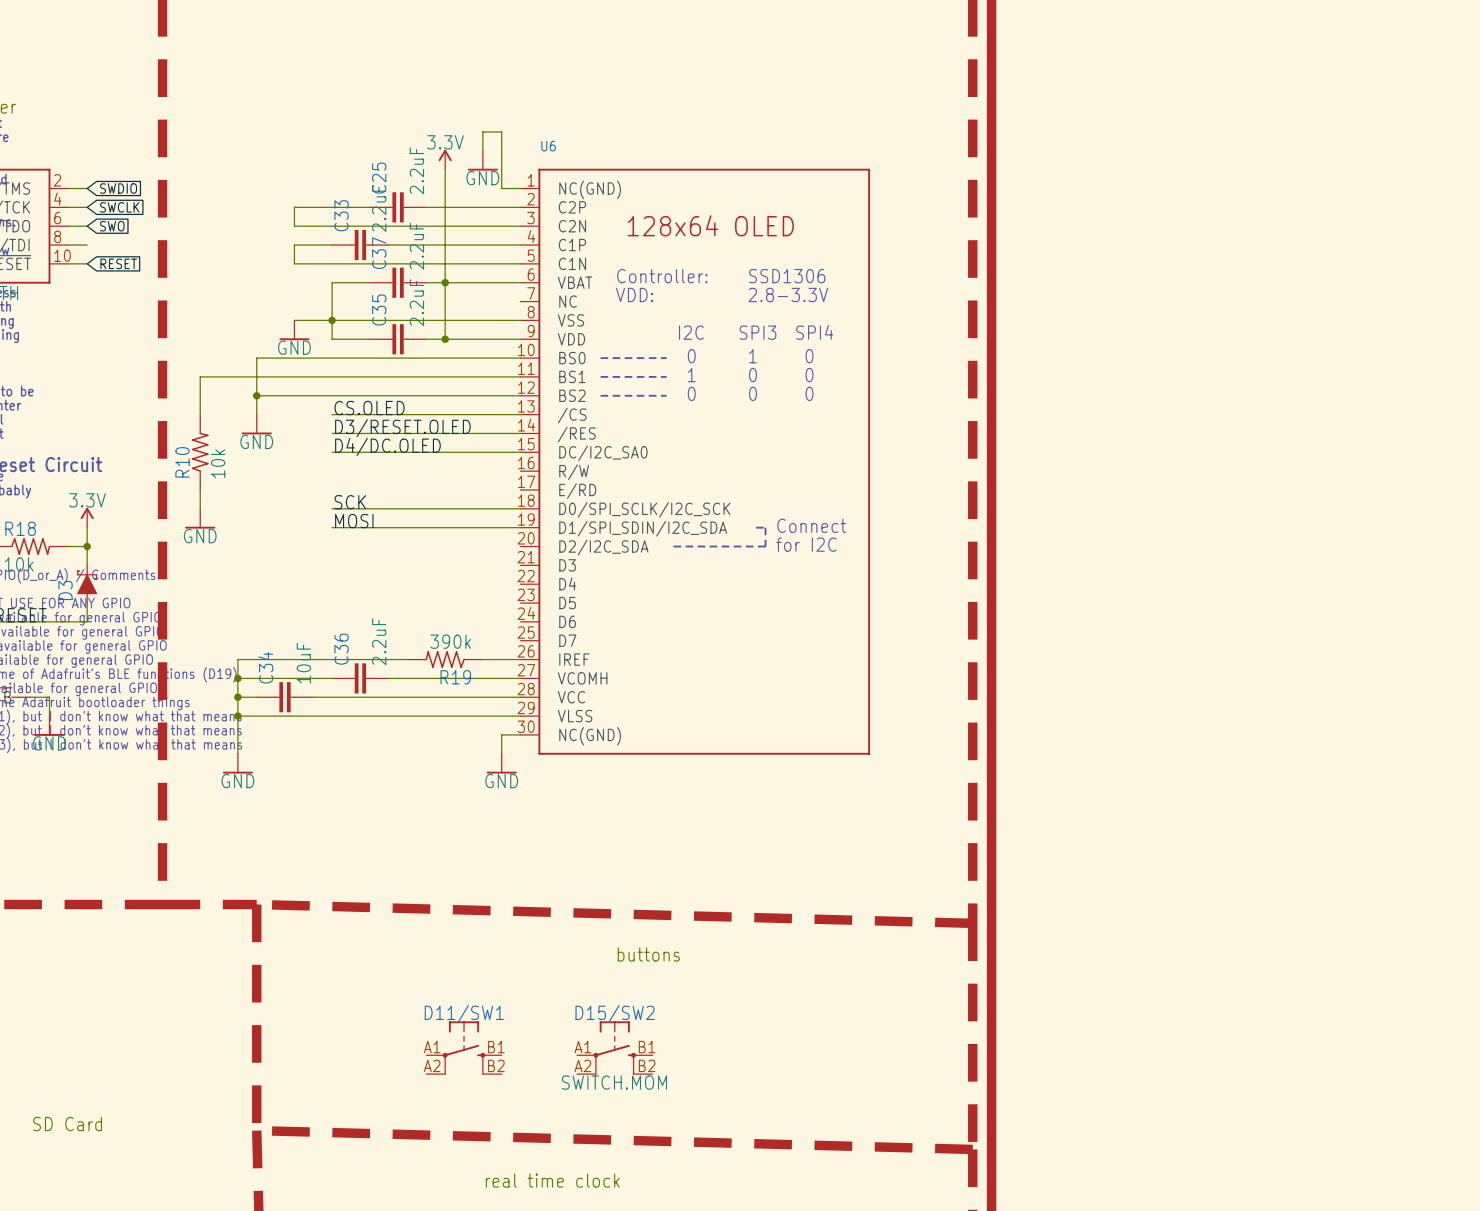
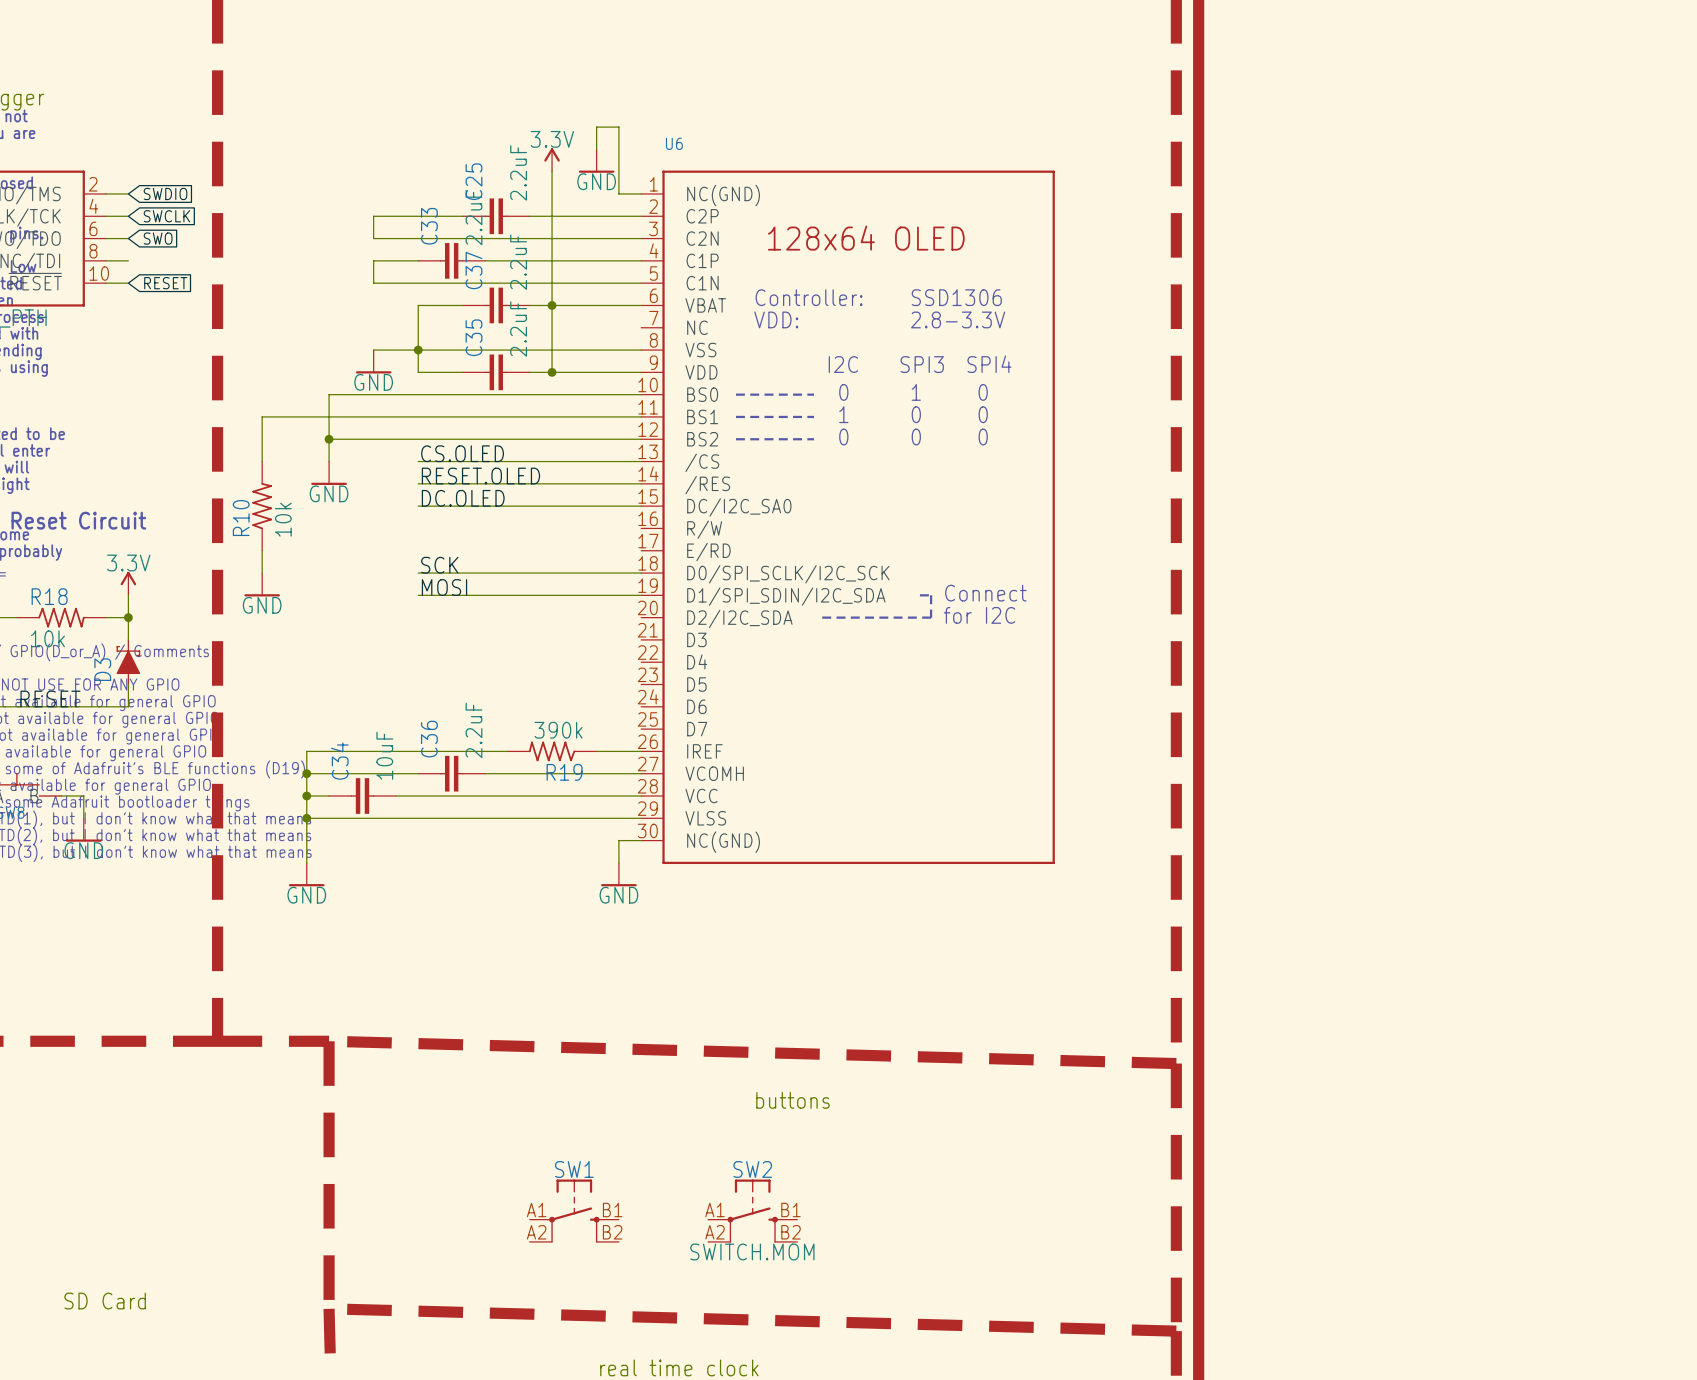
label: D3/RESET.OLED (402, 428) -> RESET.OLED (480, 476)
label: D4/DC.OLED (387, 446) -> DC.OLED (463, 498)
D11/SW1 name: D11/SW1 (464, 1014) -> SW1 (574, 1169)
D15/SW2 name: D15/SW2 (615, 1014) -> SW2 (752, 1169)

